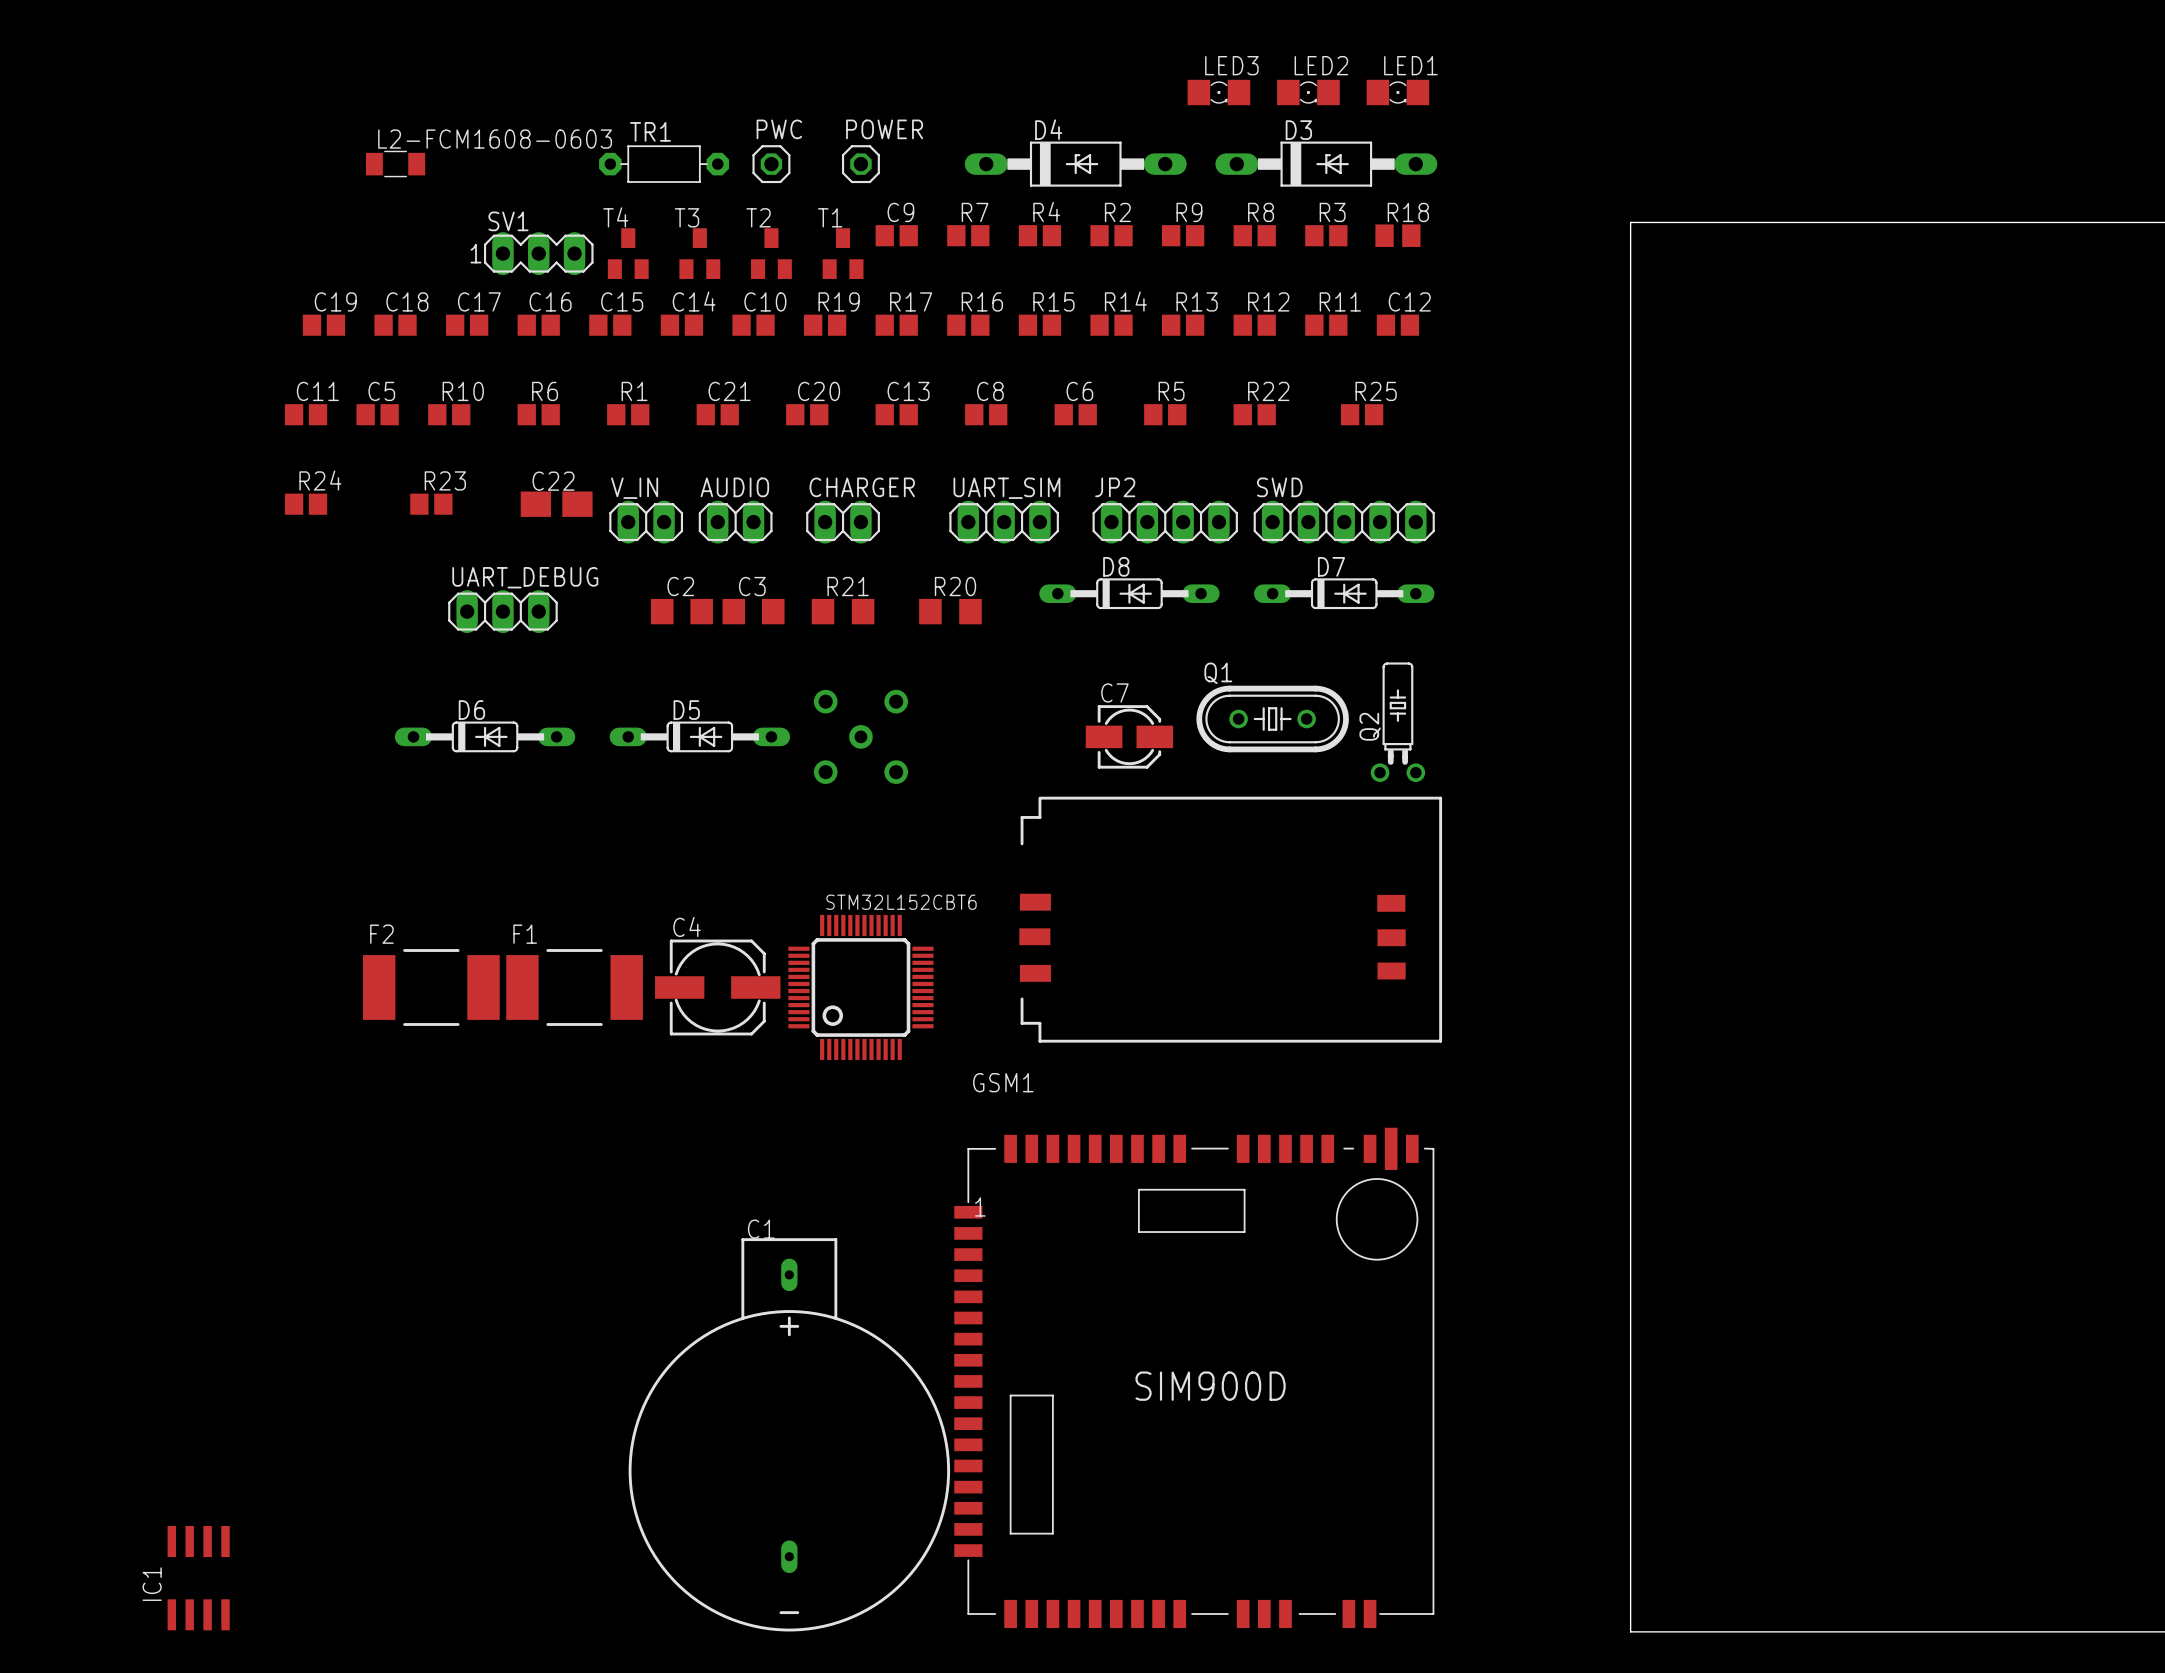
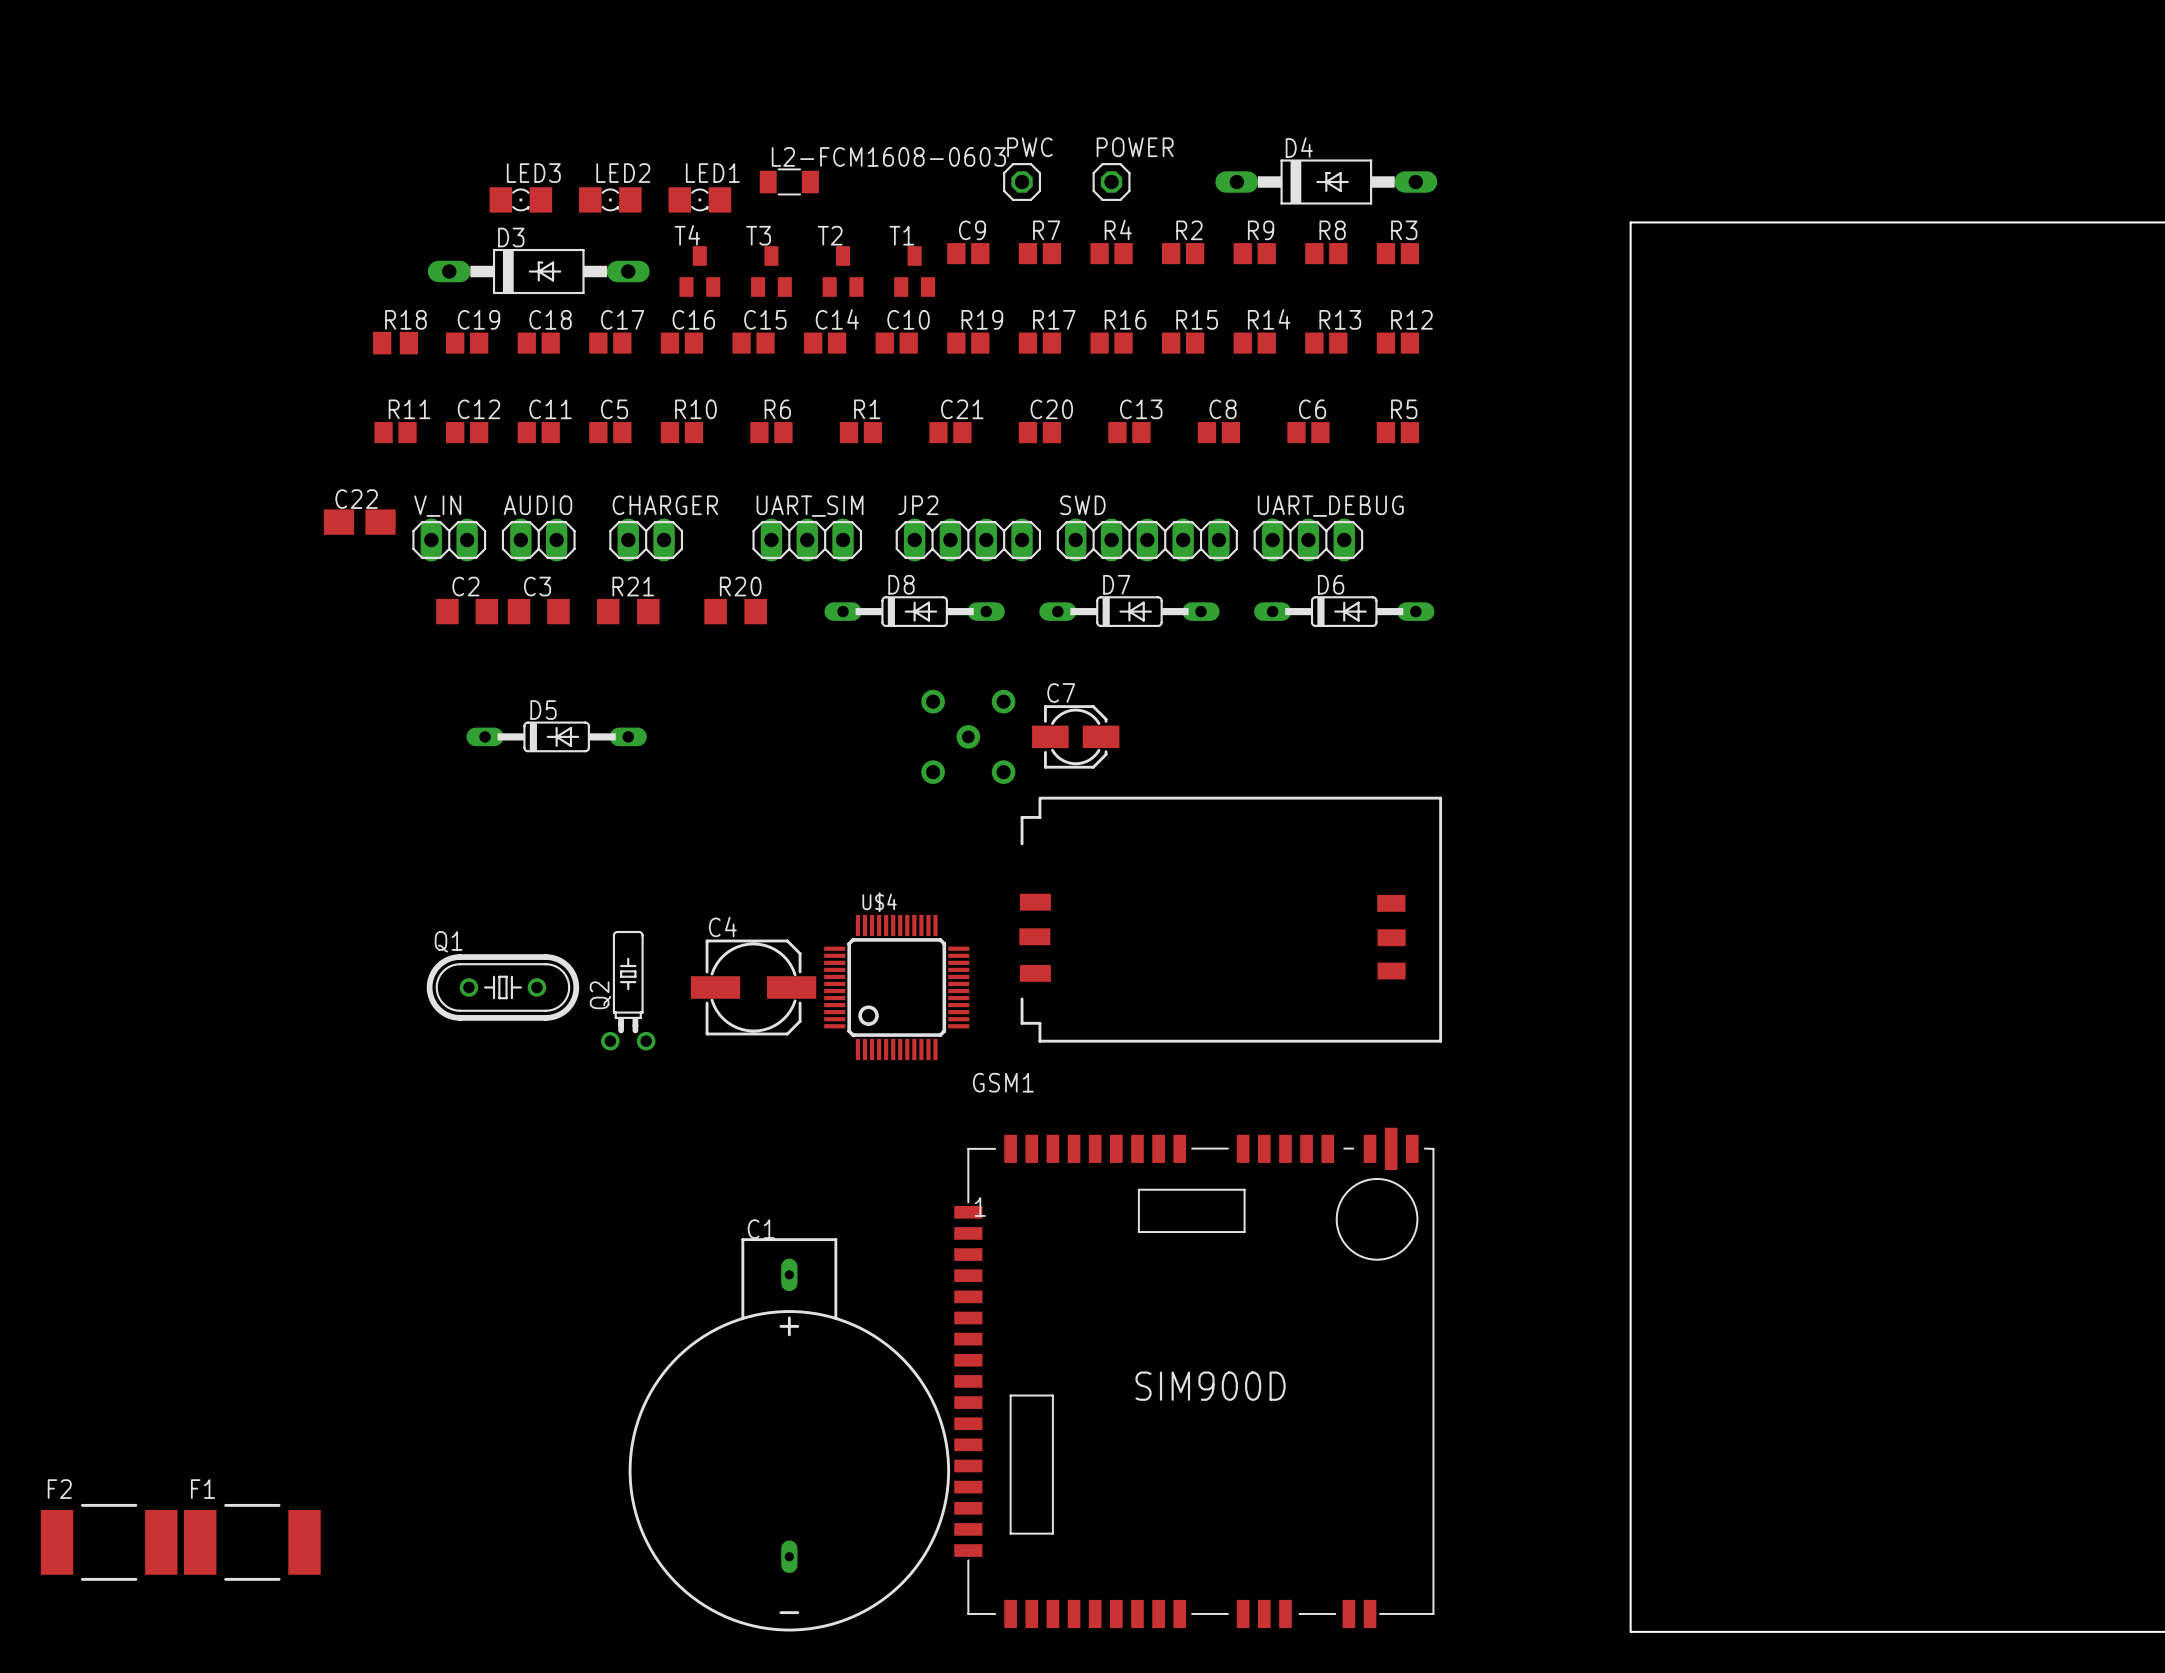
LED3 position: (1218, 92) -> (520, 199)
LED2 position: (1308, 92) -> (610, 199)
LED1 position: (1397, 92) -> (699, 199)
L2-FCM1608-0603 position: (395, 164) -> (789, 181)
TR1: (664, 164) -> none
PWC position: (771, 164) -> (1022, 182)
POWER position: (860, 164) -> (1111, 182)
D4 position: (1075, 164) -> (1326, 182)
D3 position: (1326, 164) -> (538, 271)
C9 position: (896, 235) -> (968, 253)
R7 position: (968, 235) -> (1039, 253)
R4 position: (1039, 235) -> (1111, 253)
R2 position: (1111, 235) -> (1183, 253)
R9 position: (1183, 235) -> (1254, 253)
R8 position: (1254, 235) -> (1326, 253)
R3 position: (1326, 235) -> (1397, 253)
R18 position: (1397, 235) -> (395, 343)
SV1: (538, 253) -> none
T4 position: (628, 253) -> (699, 271)
T3 position: (699, 253) -> (771, 271)
T2 position: (771, 253) -> (843, 271)
T1 position: (843, 253) -> (914, 271)
C19 position: (323, 325) -> (467, 343)
C18 position: (395, 325) -> (538, 343)
C17 position: (467, 325) -> (610, 343)
C16 position: (538, 325) -> (681, 343)
C15 position: (610, 325) -> (753, 343)
C14 position: (681, 325) -> (825, 343)
C10 position: (753, 325) -> (896, 343)
R19 position: (825, 325) -> (968, 343)
R17 position: (896, 325) -> (1039, 343)
R16 position: (968, 325) -> (1111, 343)
R15 position: (1039, 325) -> (1183, 343)
R14 position: (1111, 325) -> (1254, 343)
R13 position: (1183, 325) -> (1326, 343)
R12 position: (1254, 325) -> (1397, 343)
R11 position: (1326, 325) -> (395, 432)
C12 position: (1397, 325) -> (467, 432)
C11 position: (306, 414) -> (538, 432)
C5 position: (377, 414) -> (610, 432)
R10 position: (449, 414) -> (681, 432)
R6 position: (538, 414) -> (771, 432)
R1 position: (628, 414) -> (860, 432)
C21 position: (717, 414) -> (950, 432)
C20 position: (807, 414) -> (1039, 432)
C13 position: (896, 414) -> (1129, 432)
C8 position: (986, 414) -> (1218, 432)
C6 position: (1075, 414) -> (1308, 432)
R5 position: (1165, 414) -> (1397, 432)
R22: (1254, 414) -> none
R25: (1362, 414) -> none
R24: (306, 504) -> none
R23: (431, 504) -> none
C22 position: (556, 504) -> (359, 522)
V_IN position: (646, 522) -> (449, 540)
AUDIO position: (735, 522) -> (538, 540)
CHARGER position: (843, 522) -> (646, 540)
UART_SIM position: (1004, 522) -> (807, 540)
JP2 position: (1165, 522) -> (968, 540)
SWD position: (1344, 522) -> (1147, 540)
UART_DEBUG: none -> (1308, 540)
D8 position: (1129, 593) -> (914, 611)
D7 position: (1344, 593) -> (1129, 611)
UART_DEBUG: (502, 611) -> none
C2 position: (681, 611) -> (467, 611)
C3 position: (753, 611) -> (538, 611)
R21 position: (843, 611) -> (628, 611)
R20 position: (950, 611) -> (735, 611)
Q1 position: (1272, 718) -> (502, 987)
Q2 position: (1397, 722) -> (628, 990)
D6 position: (485, 736) -> (1344, 611)
D5 position: (699, 736) -> (556, 736)
part position: (860, 736) -> (968, 736)
C7 position: (1129, 736) -> (1075, 736)
F2 position: (431, 987) -> (109, 1542)
F1 position: (574, 987) -> (252, 1542)
C4 position: (717, 987) -> (753, 987)
STM32L152CBT6: (860, 987) -> none
U$4: none -> (896, 987)
IC1: (198, 1578) -> none

